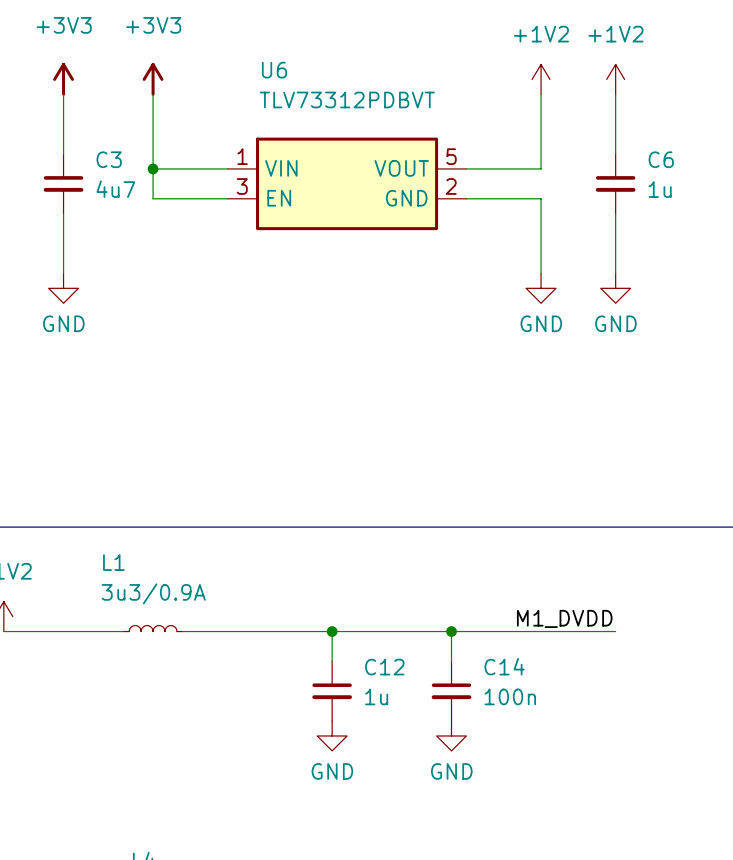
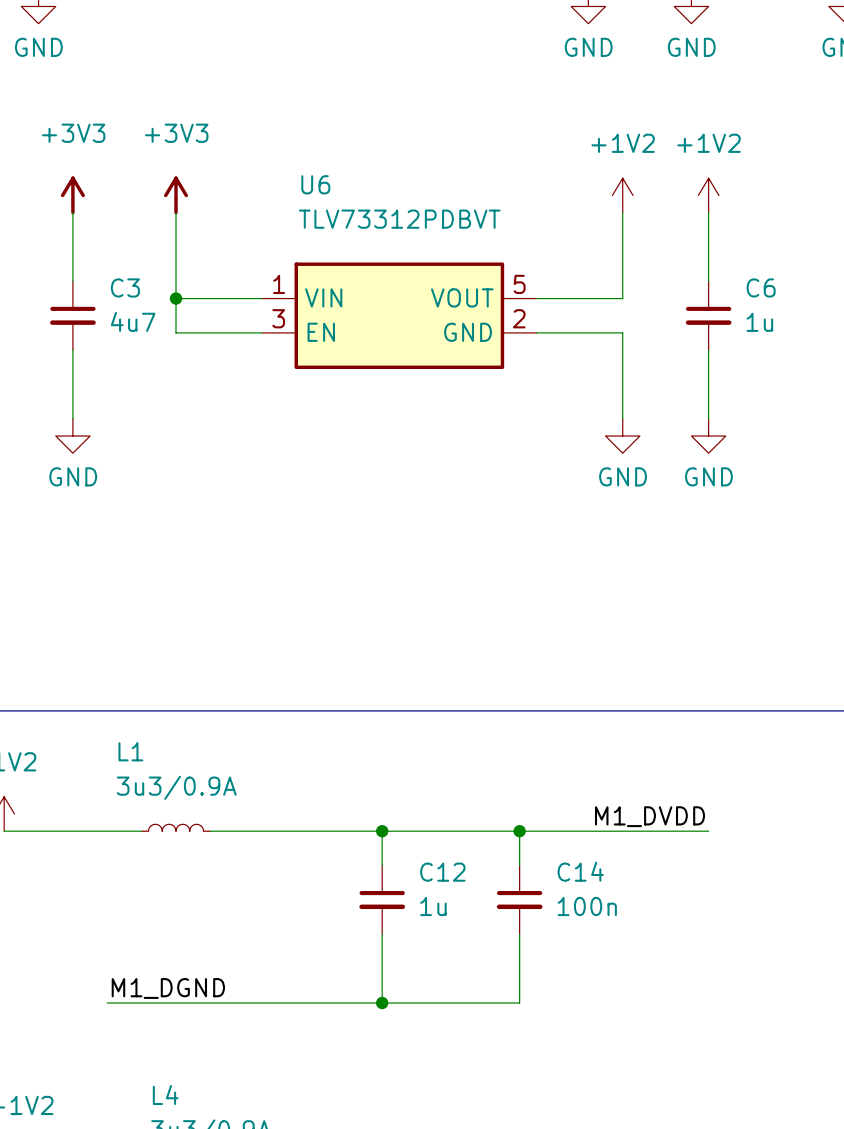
wire: none -> (382, 934) (382, 1003)
wire: none -> (519, 934) (519, 1003) (107, 1003)
power symbol: GND (332, 735) -> none
power symbol: GND (451, 735) -> none
label: none -> M1_DGND (168, 988)
junction: none -> (382, 1003)

